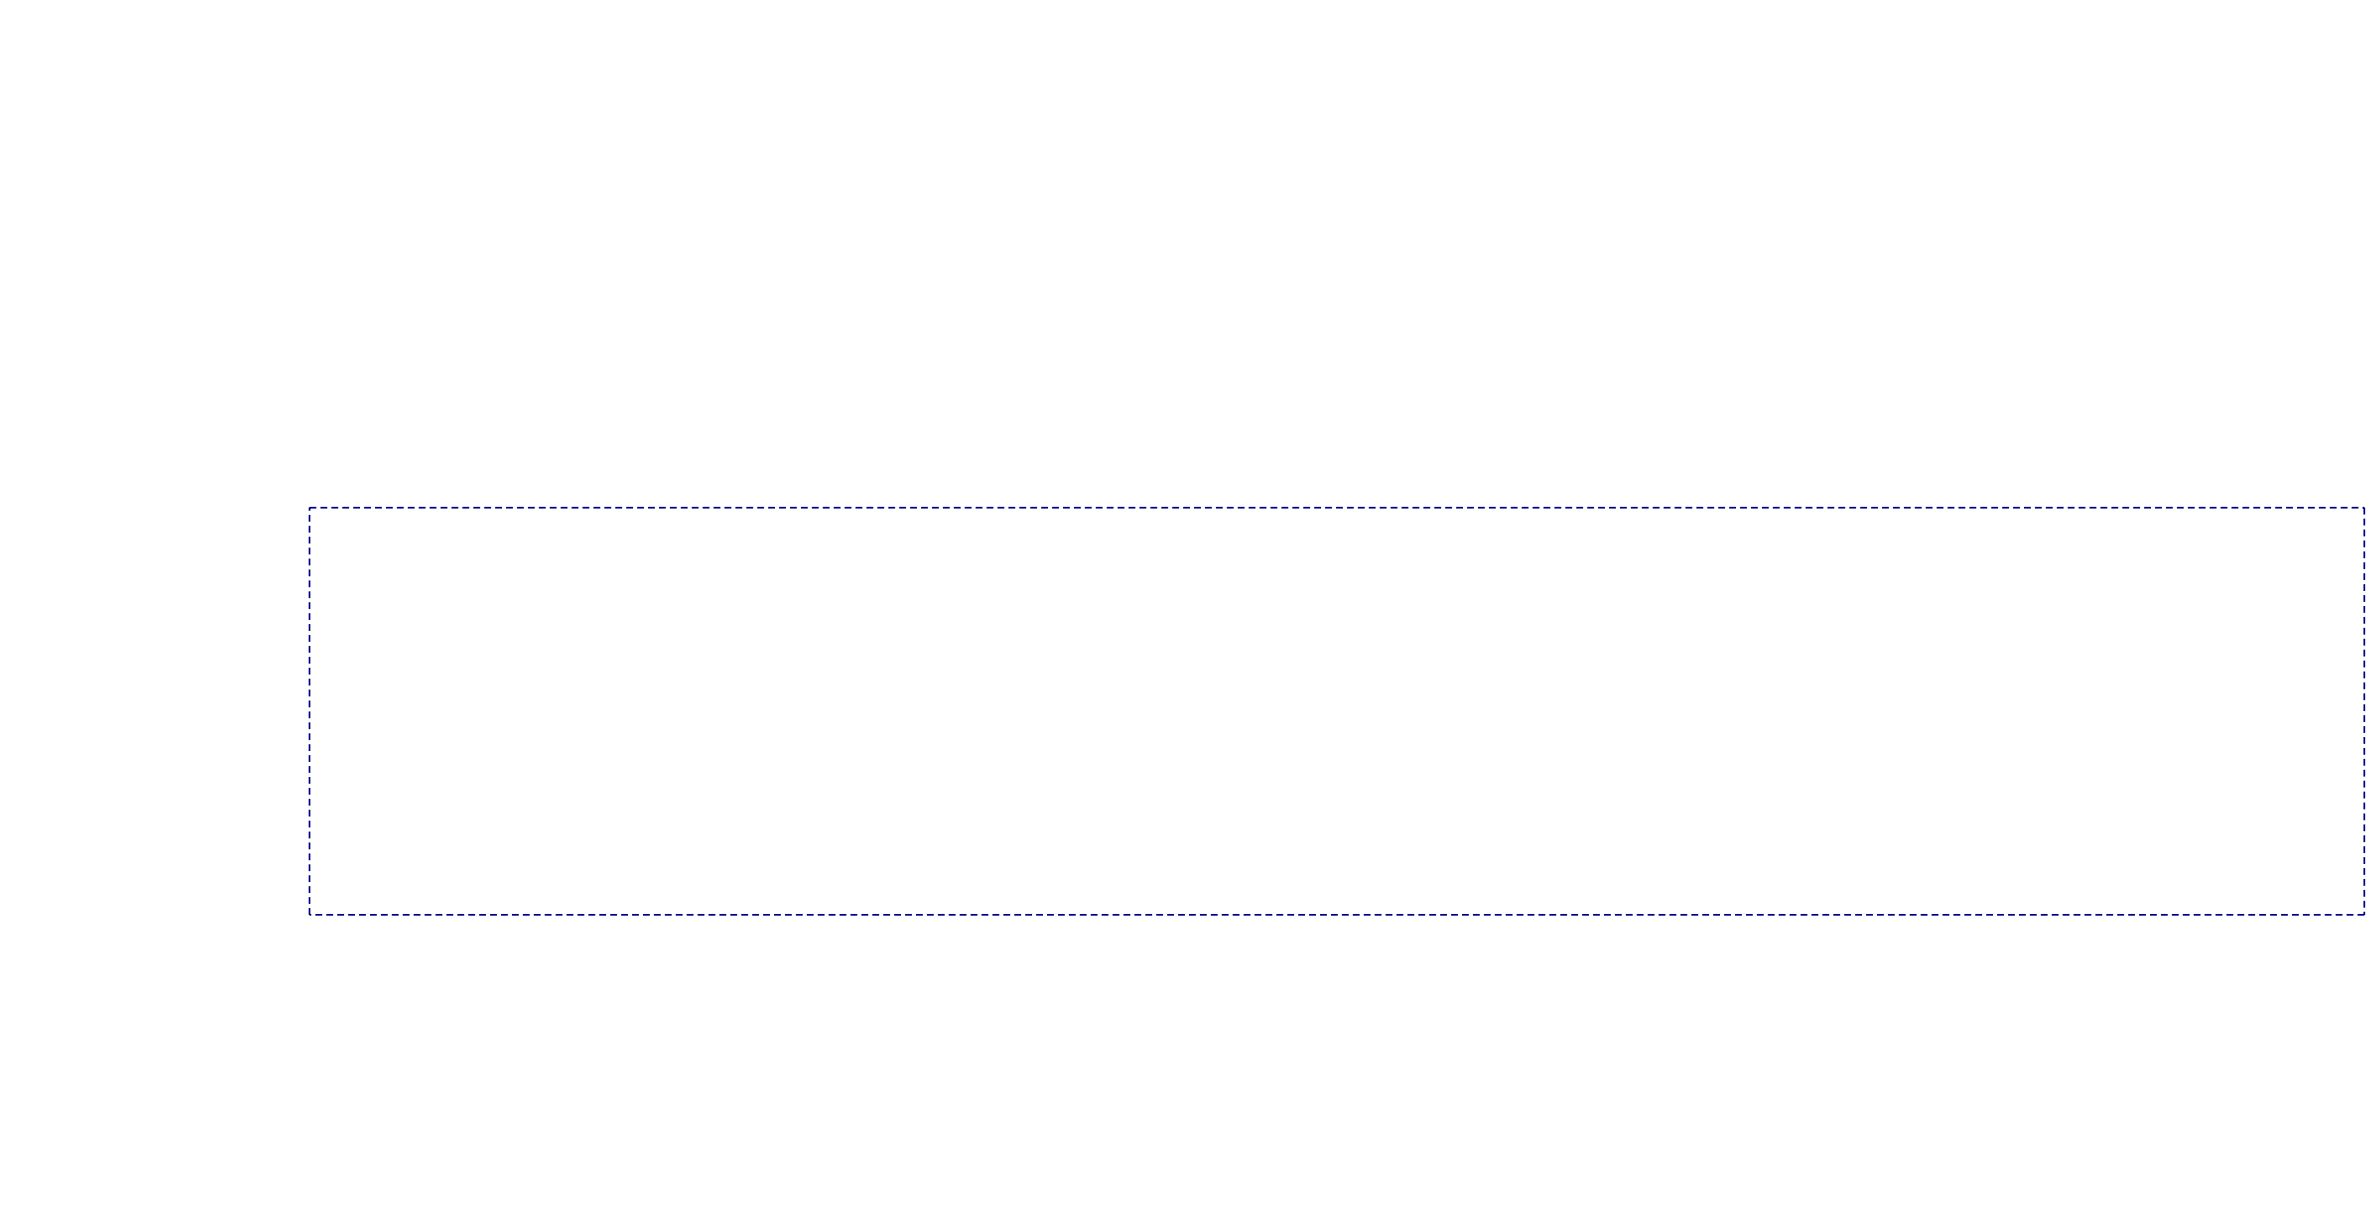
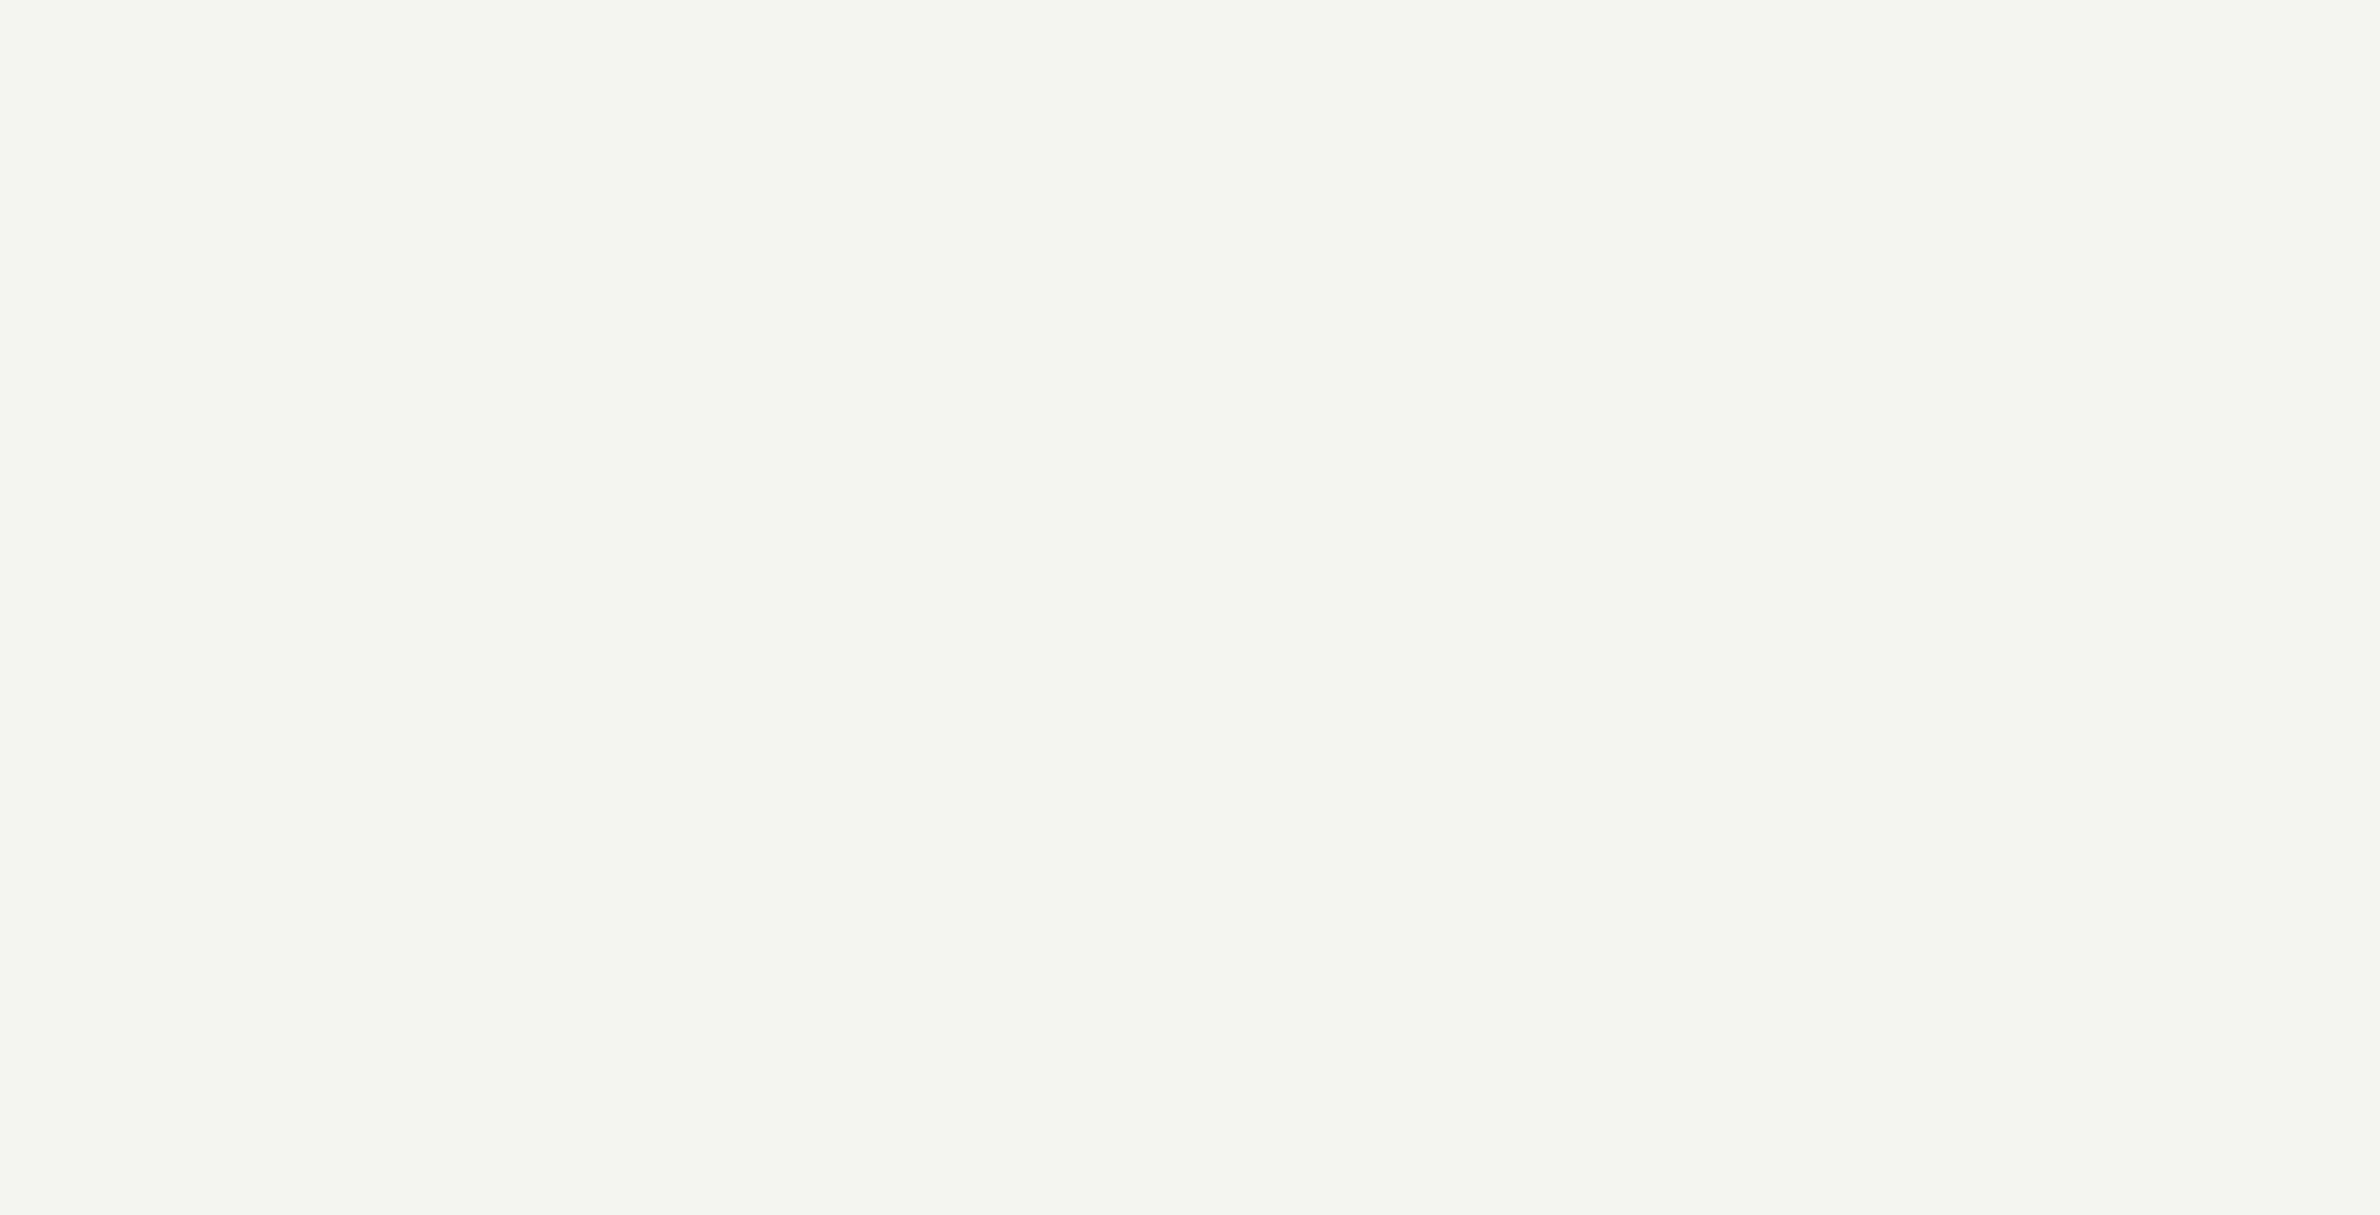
line: (309, 507) (2364, 507) (2364, 914) (309, 914) (309, 507) -> none

